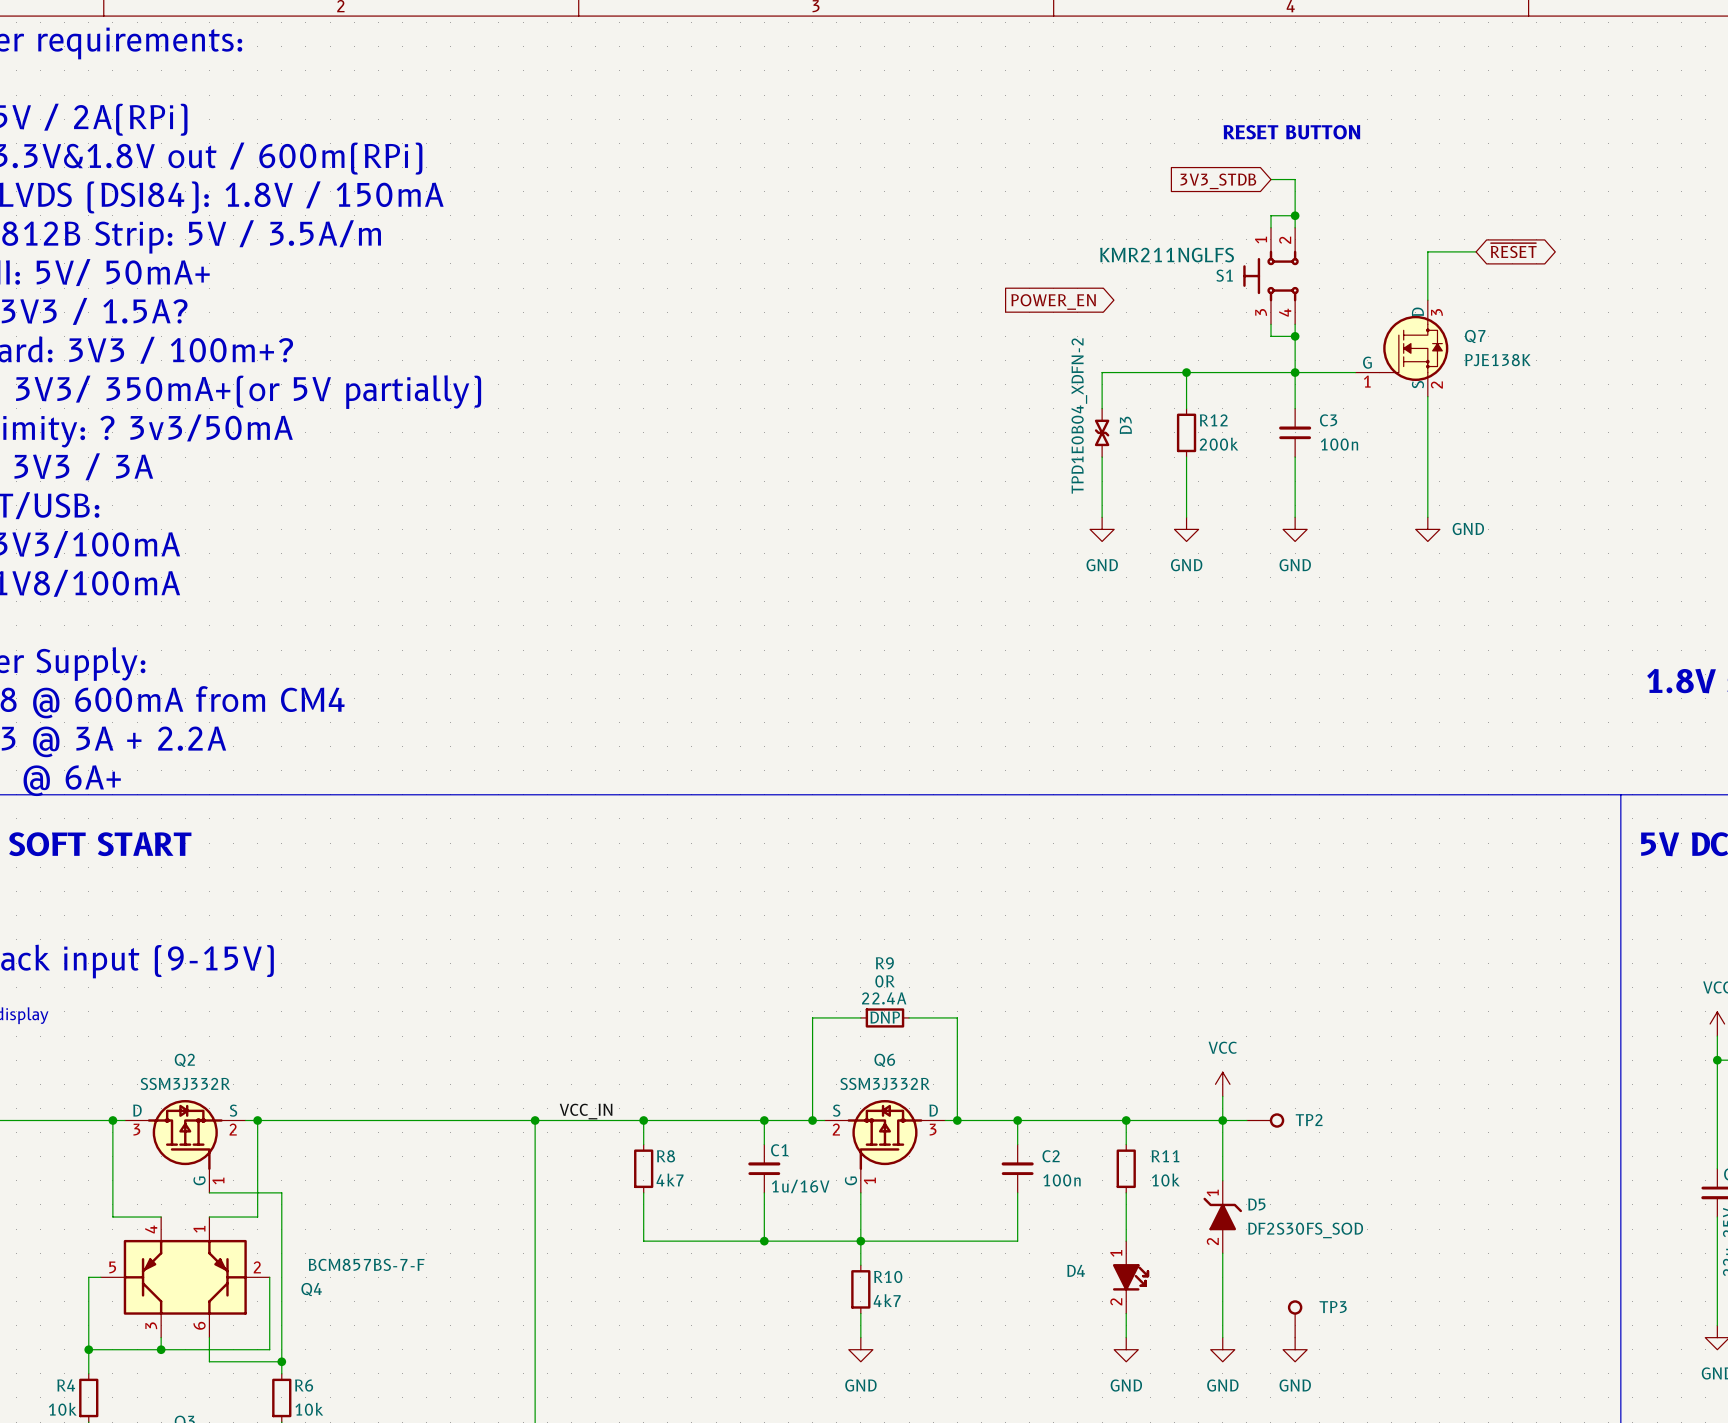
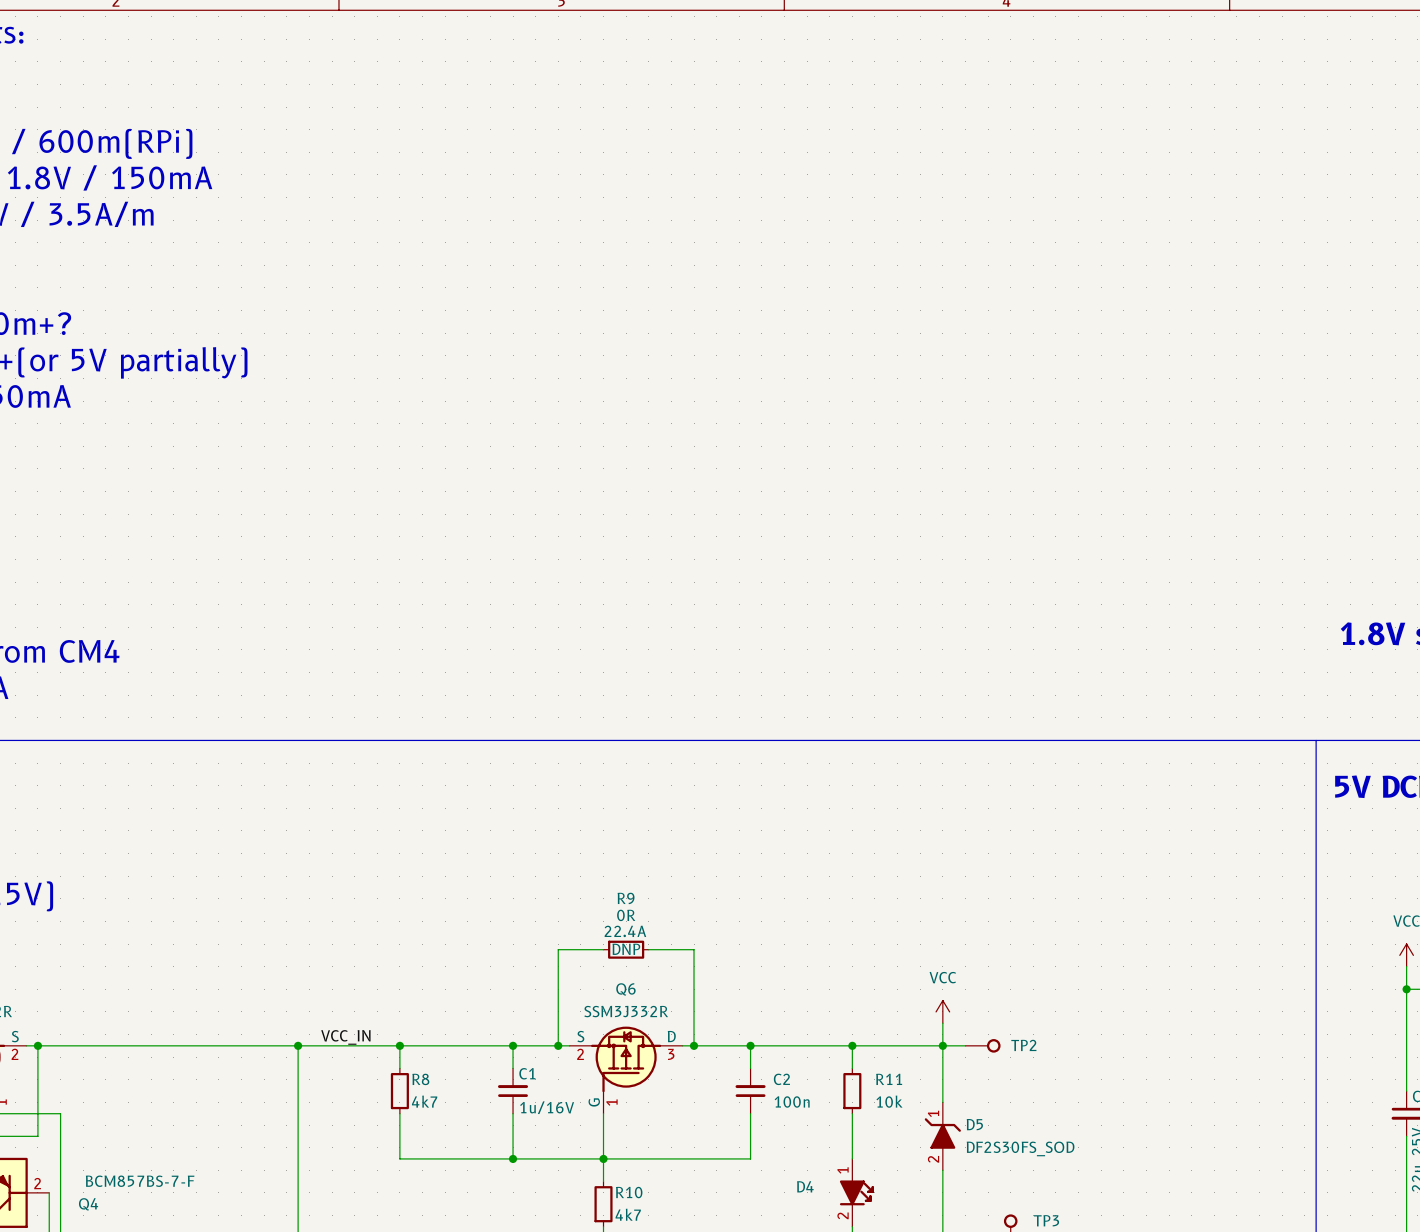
text: RESET BUTTON (1291, 132) -> none
wire: (1270, 179) (1295, 179) (1295, 227) -> none
global label: 3V3_STDB (1218, 181) -> none
wire: (1295, 215) (1270, 215) (1270, 227) -> none
junction: (1295, 215) -> none
global label: ~{RESET} (1513, 250) -> none
wire: (1476, 251) (1427, 251) (1427, 300) -> none
S1: (1270, 276) -> none
global label: POWER_EN (1053, 301) -> none
wire: (1270, 324) (1270, 336) (1295, 336) -> none
wire: (1295, 324) (1295, 408) -> none
junction: (1295, 336) -> none
Q7: PJE138K (1401, 348) -> none
wire: (1186, 372) (1186, 408) -> none
junction: (1186, 372) -> none
junction: (1295, 372) -> none
wire: (1355, 372) (1102, 372) (1102, 408) -> none
wire: (1427, 396) (1427, 517) -> none
D3: TPD1E0B04_XDFN-2 (1102, 432) -> none
R12: (1186, 432) -> none
C3: (1295, 432) -> none
wire: (1102, 457) (1102, 517) -> none
wire: (1186, 457) (1186, 517) -> none
wire: (1295, 457) (1295, 517) -> none
power symbol: GND (1102, 529) -> none
power symbol: GND (1186, 529) -> none
power symbol: GND (1295, 529) -> none
power symbol: GND (1427, 529) -> none

